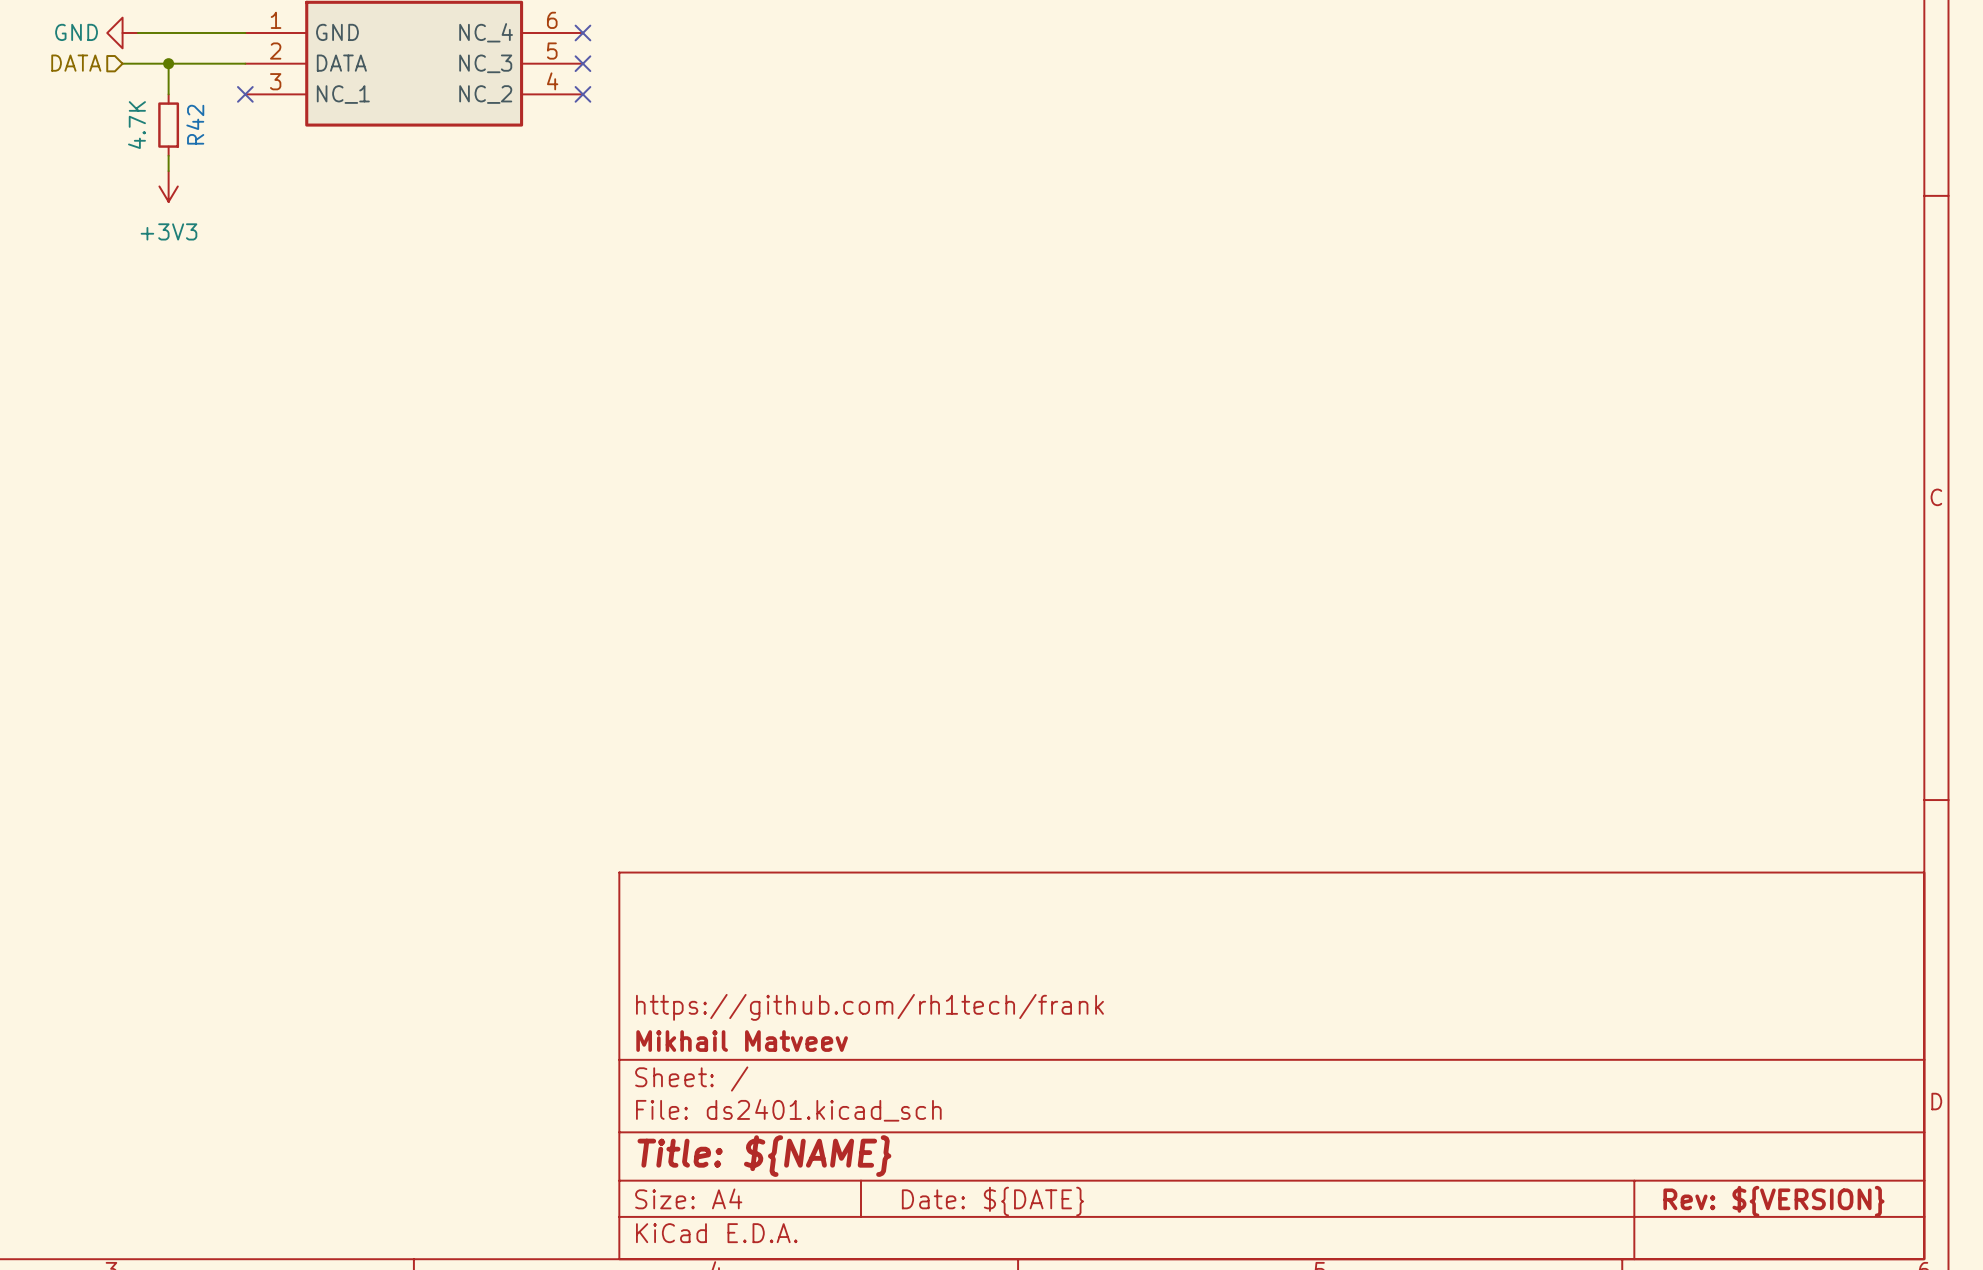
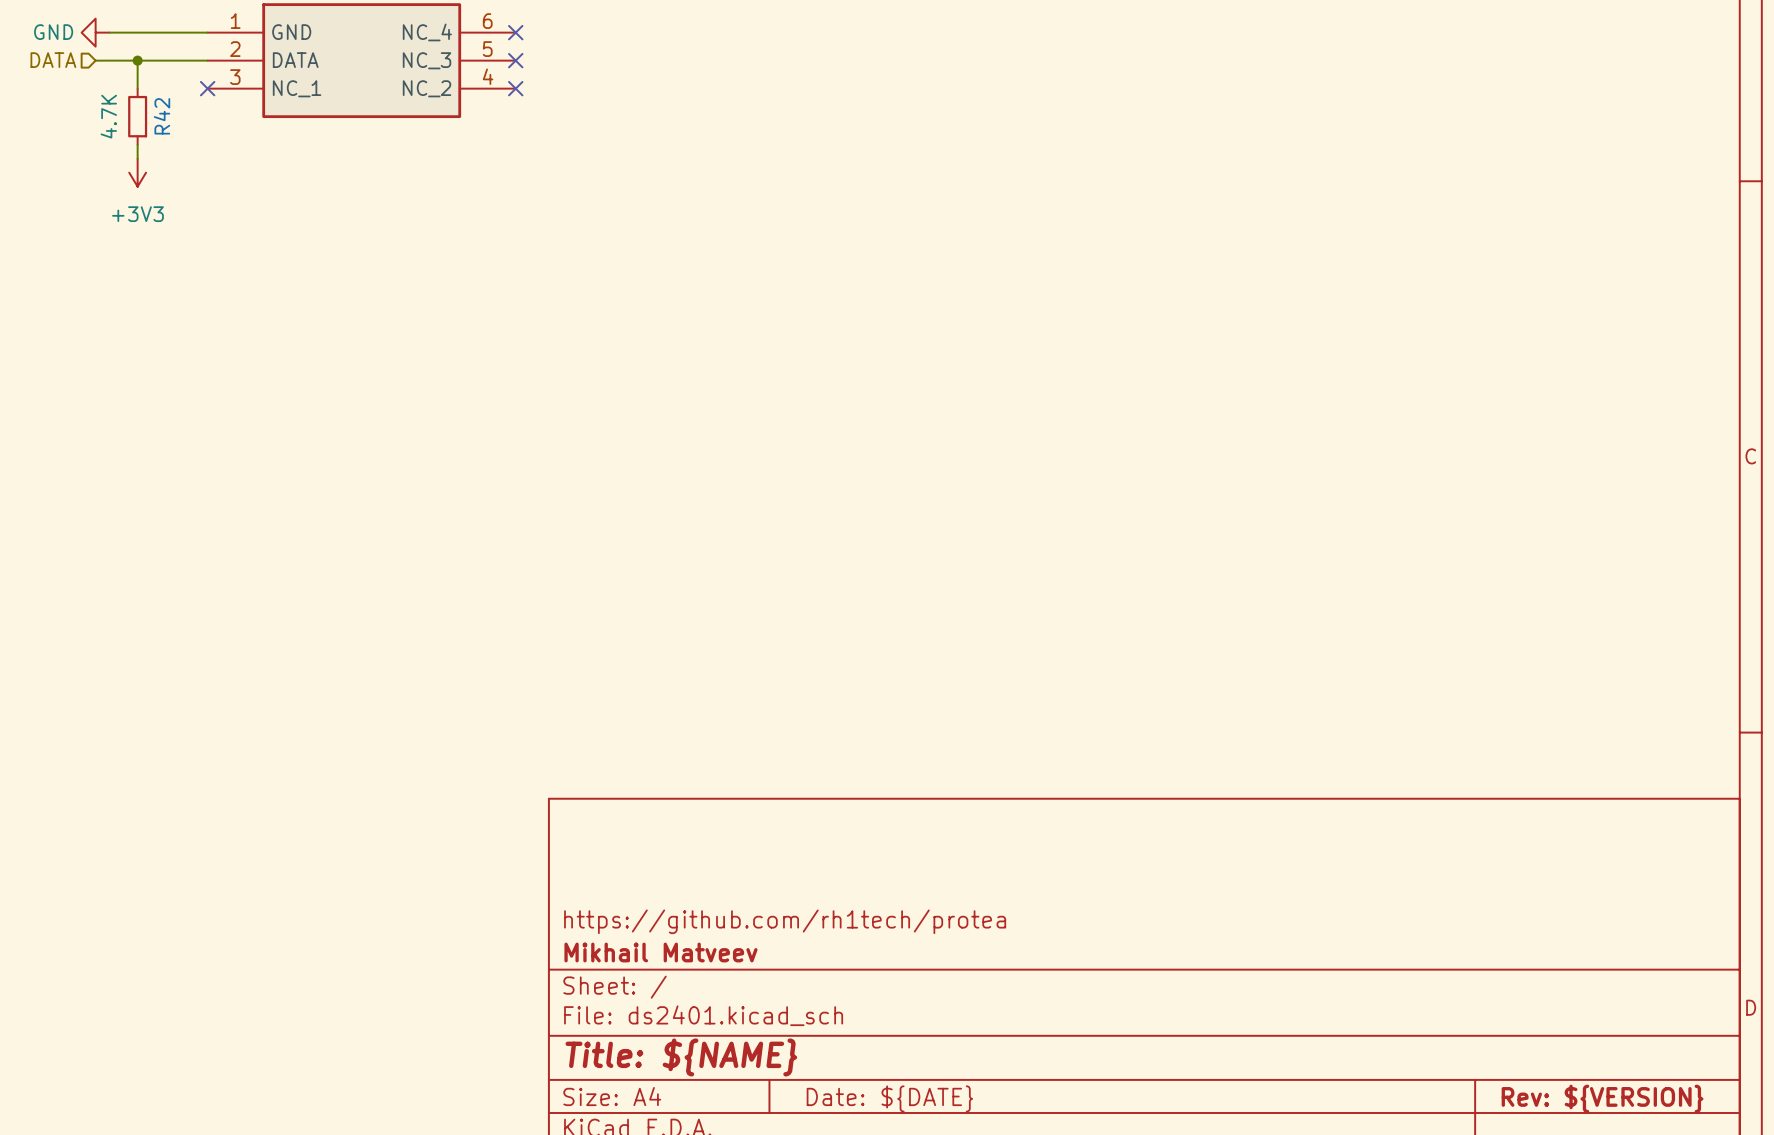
title block: https://github.com/rh1tech/frank (869, 1007) -> https://github.com/rh1tech/protea (785, 921)

